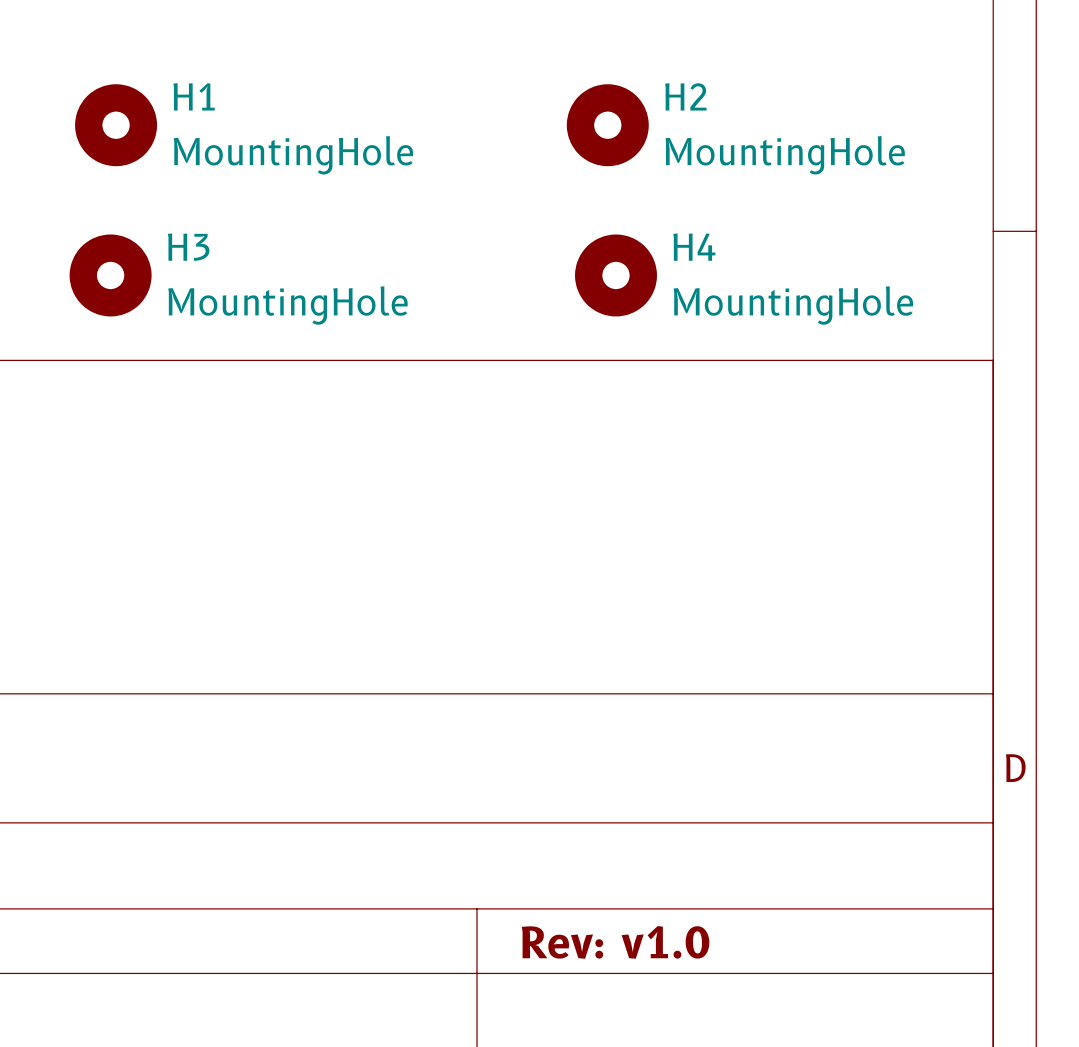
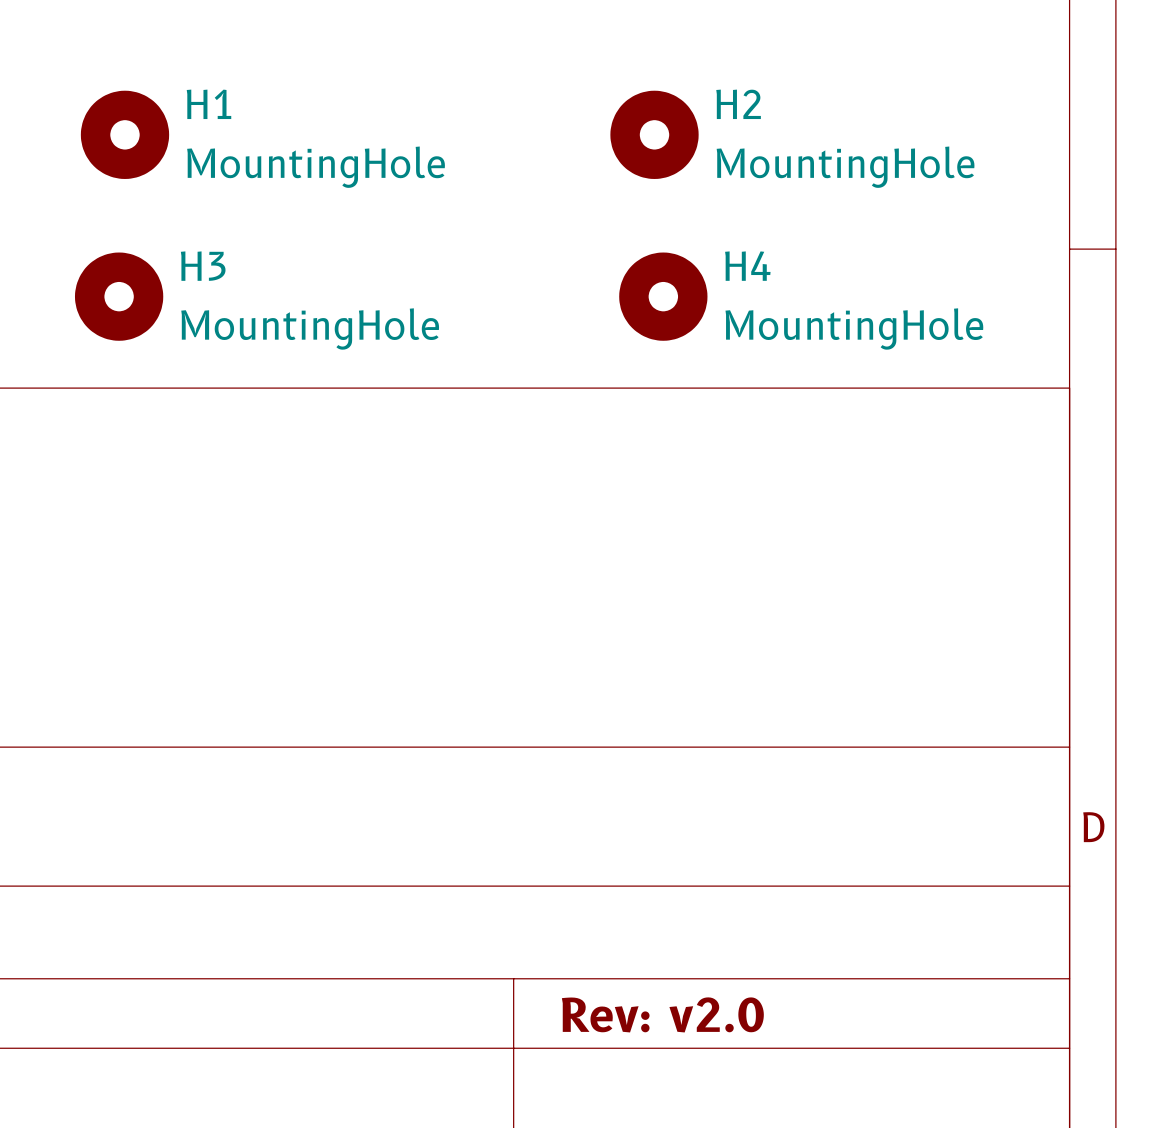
title block: Rev: v1.0 (615, 942) -> Rev: v2.0 (662, 1014)

